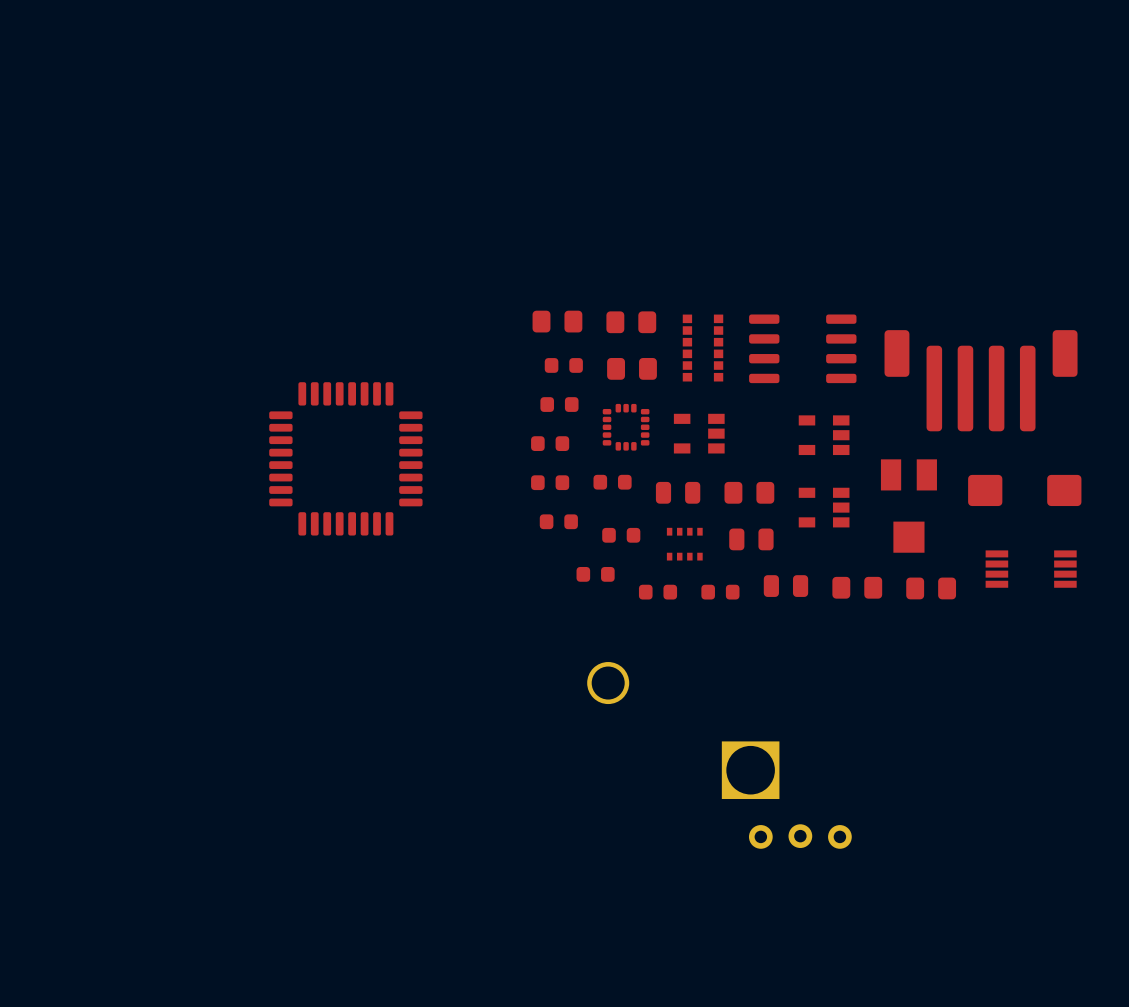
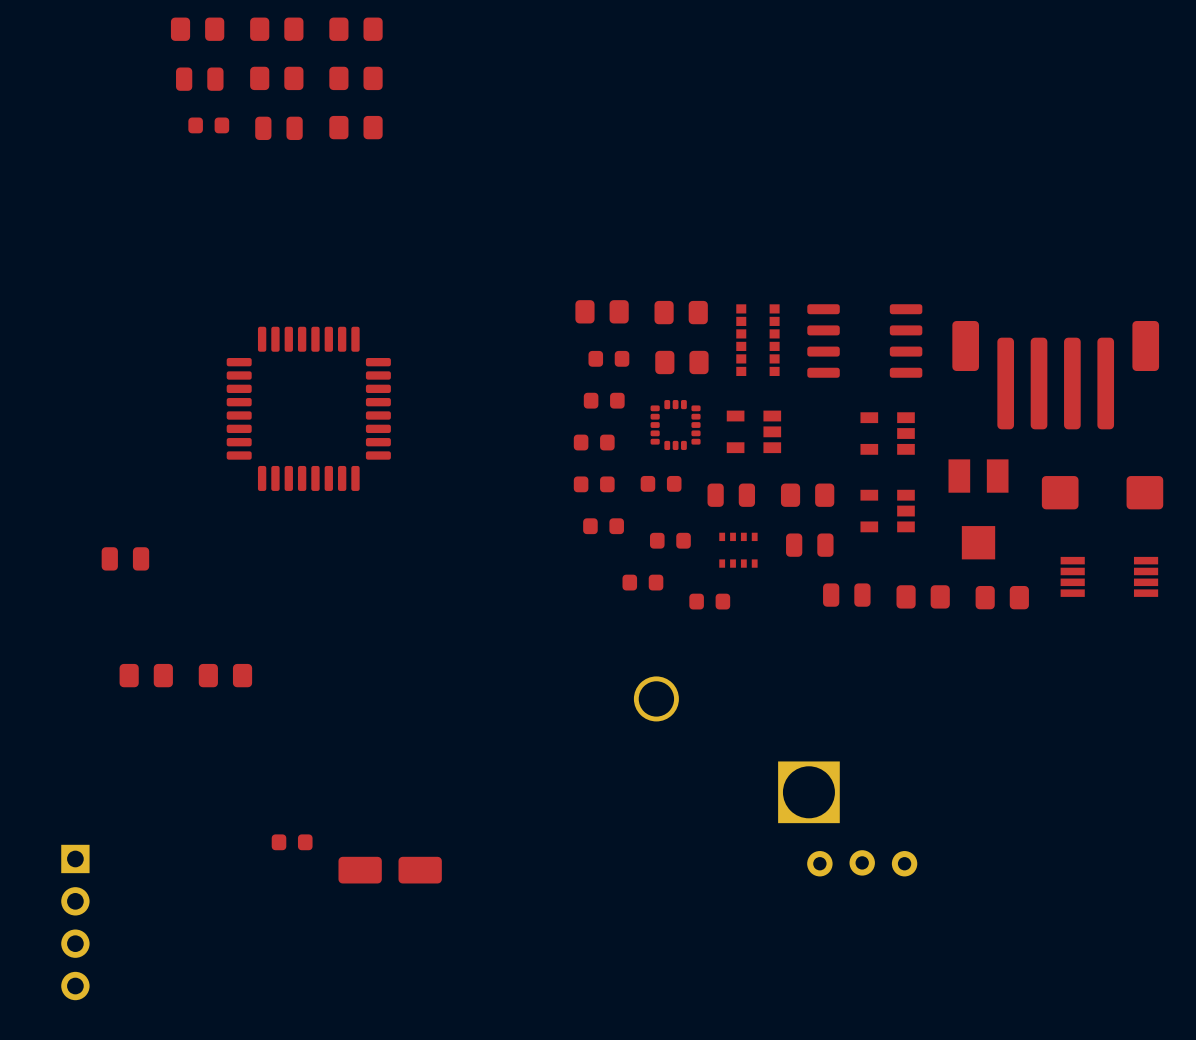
part: none -> (197, 29)
part: none -> (276, 29)
part: none -> (355, 29)
part: none -> (276, 78)
part: none -> (355, 78)
part: none -> (199, 79)
part: none -> (208, 125)
part: none -> (355, 127)
part: none -> (278, 128)
part position: (345, 458) -> (308, 408)
part: none -> (125, 558)
part: (720, 592) -> none
part: none -> (146, 675)
part: none -> (225, 675)
part: none -> (292, 842)
part: none -> (390, 870)
part: none -> (75, 922)

